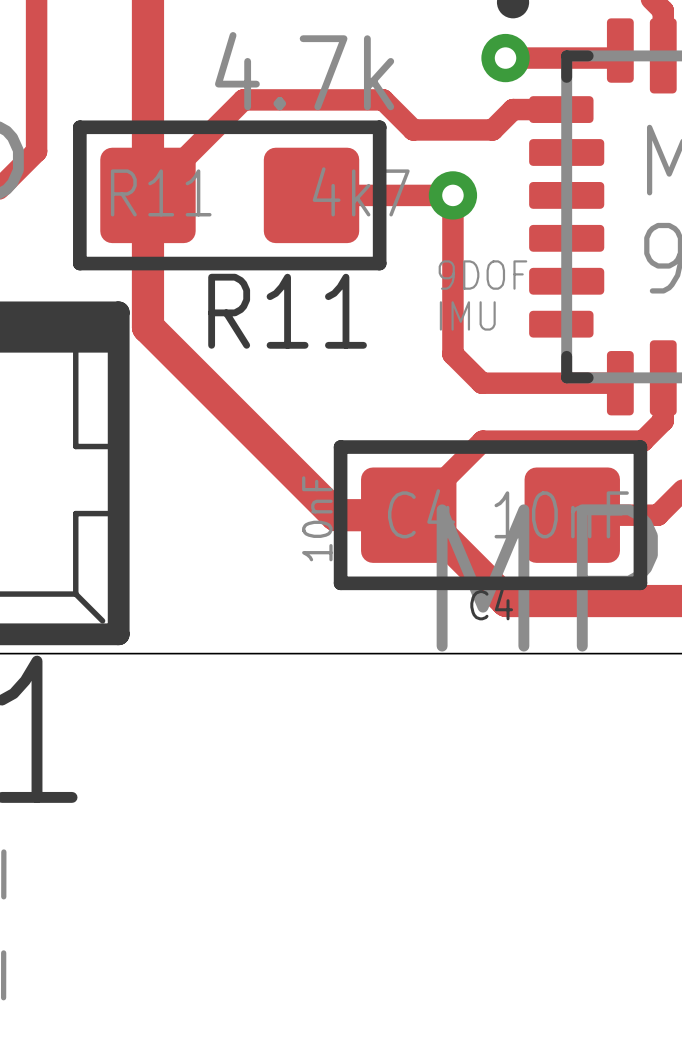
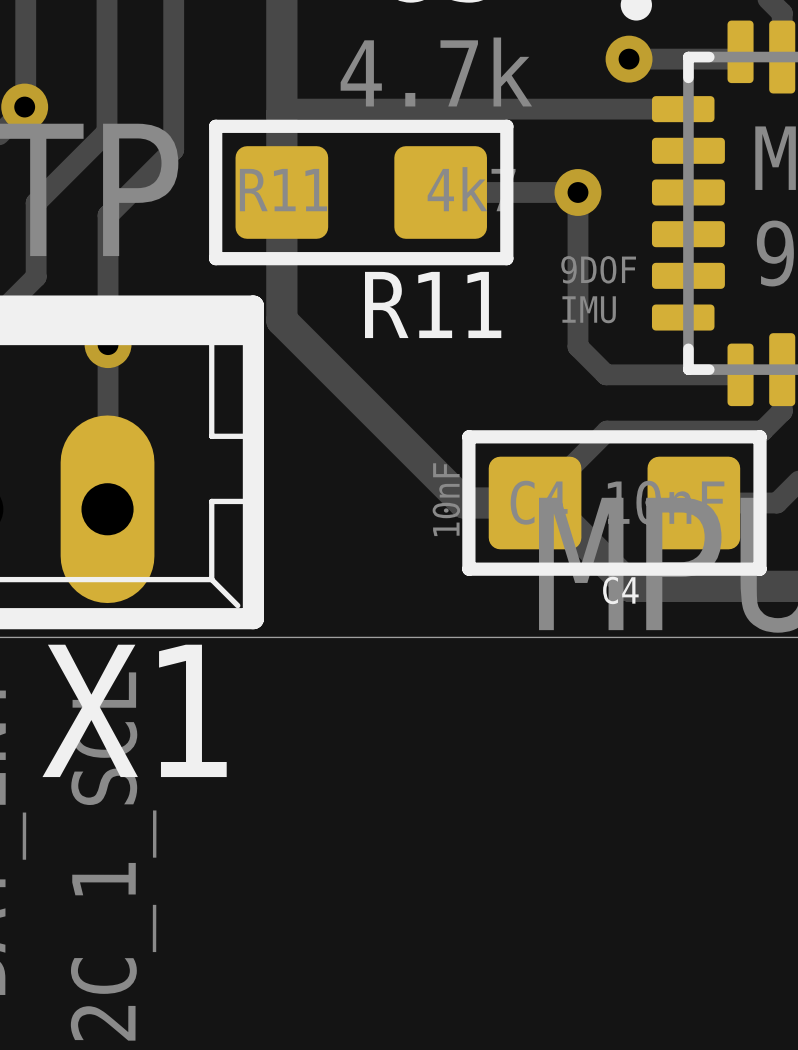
track: (513, 109) (492, 129) (413, 129) (383, 99) (243, 99) (147, 195) -> (636, 109) (287, 109) (281, 114)

